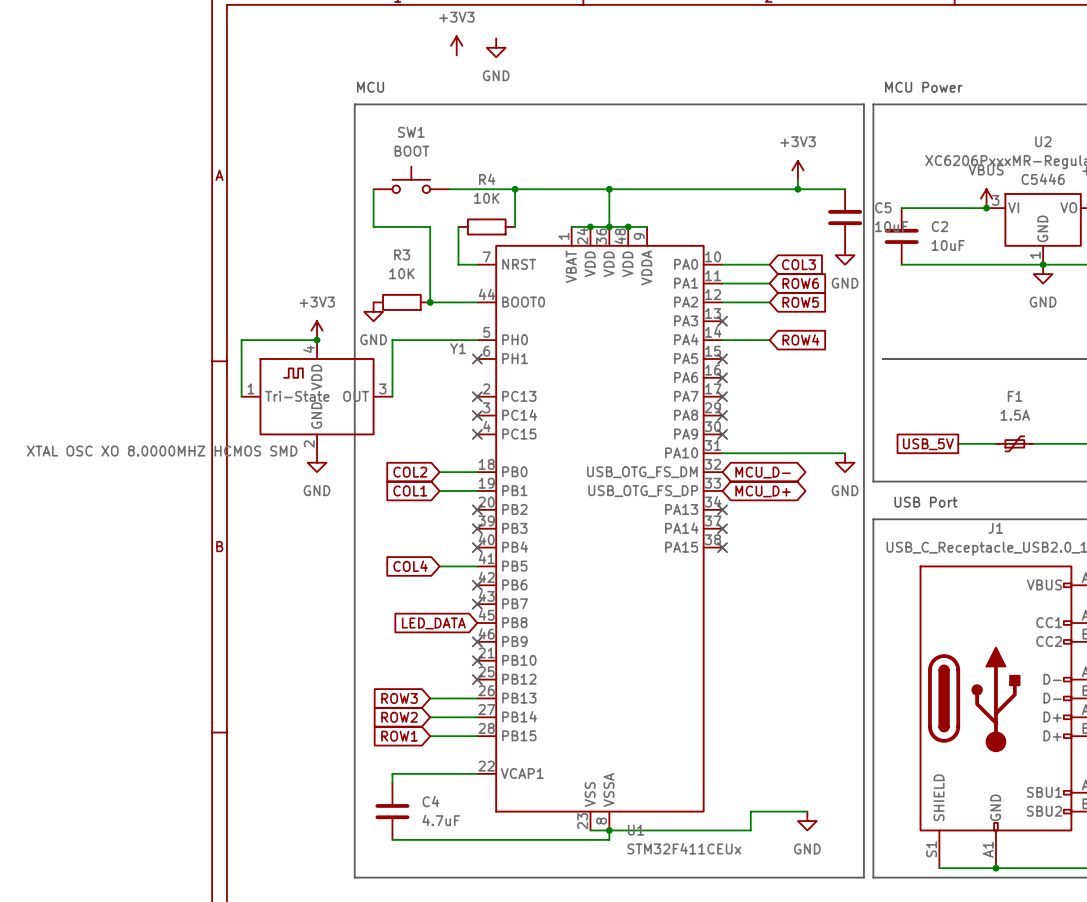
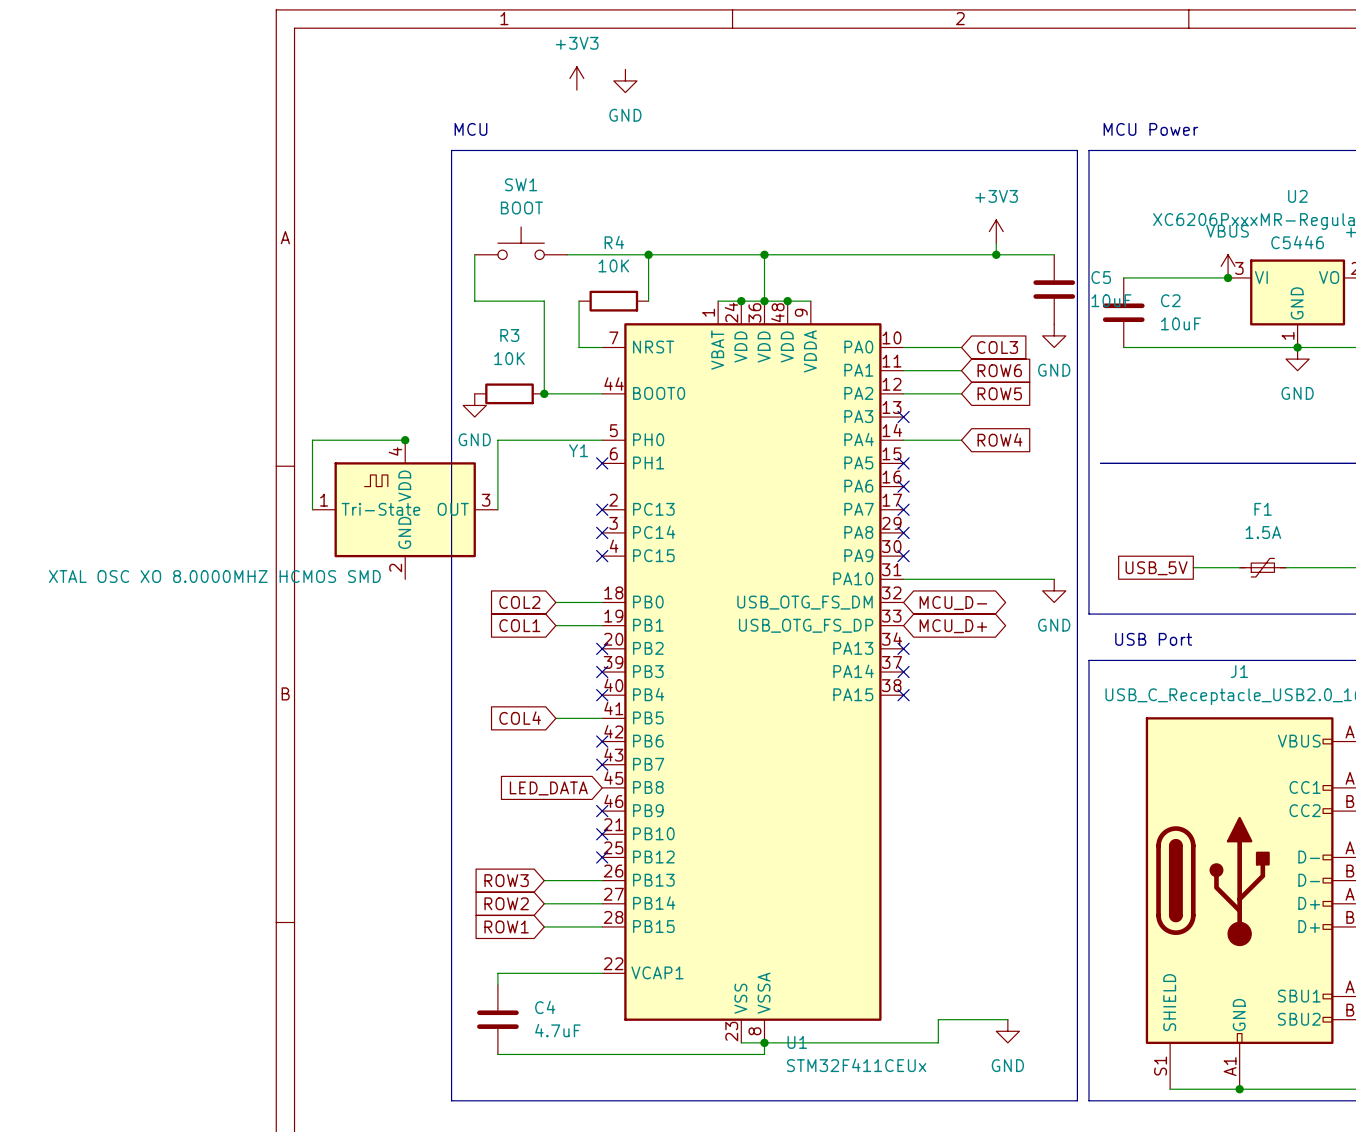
power symbol: +3V3 (317, 330) -> none
power symbol: GND (317, 462) -> none

